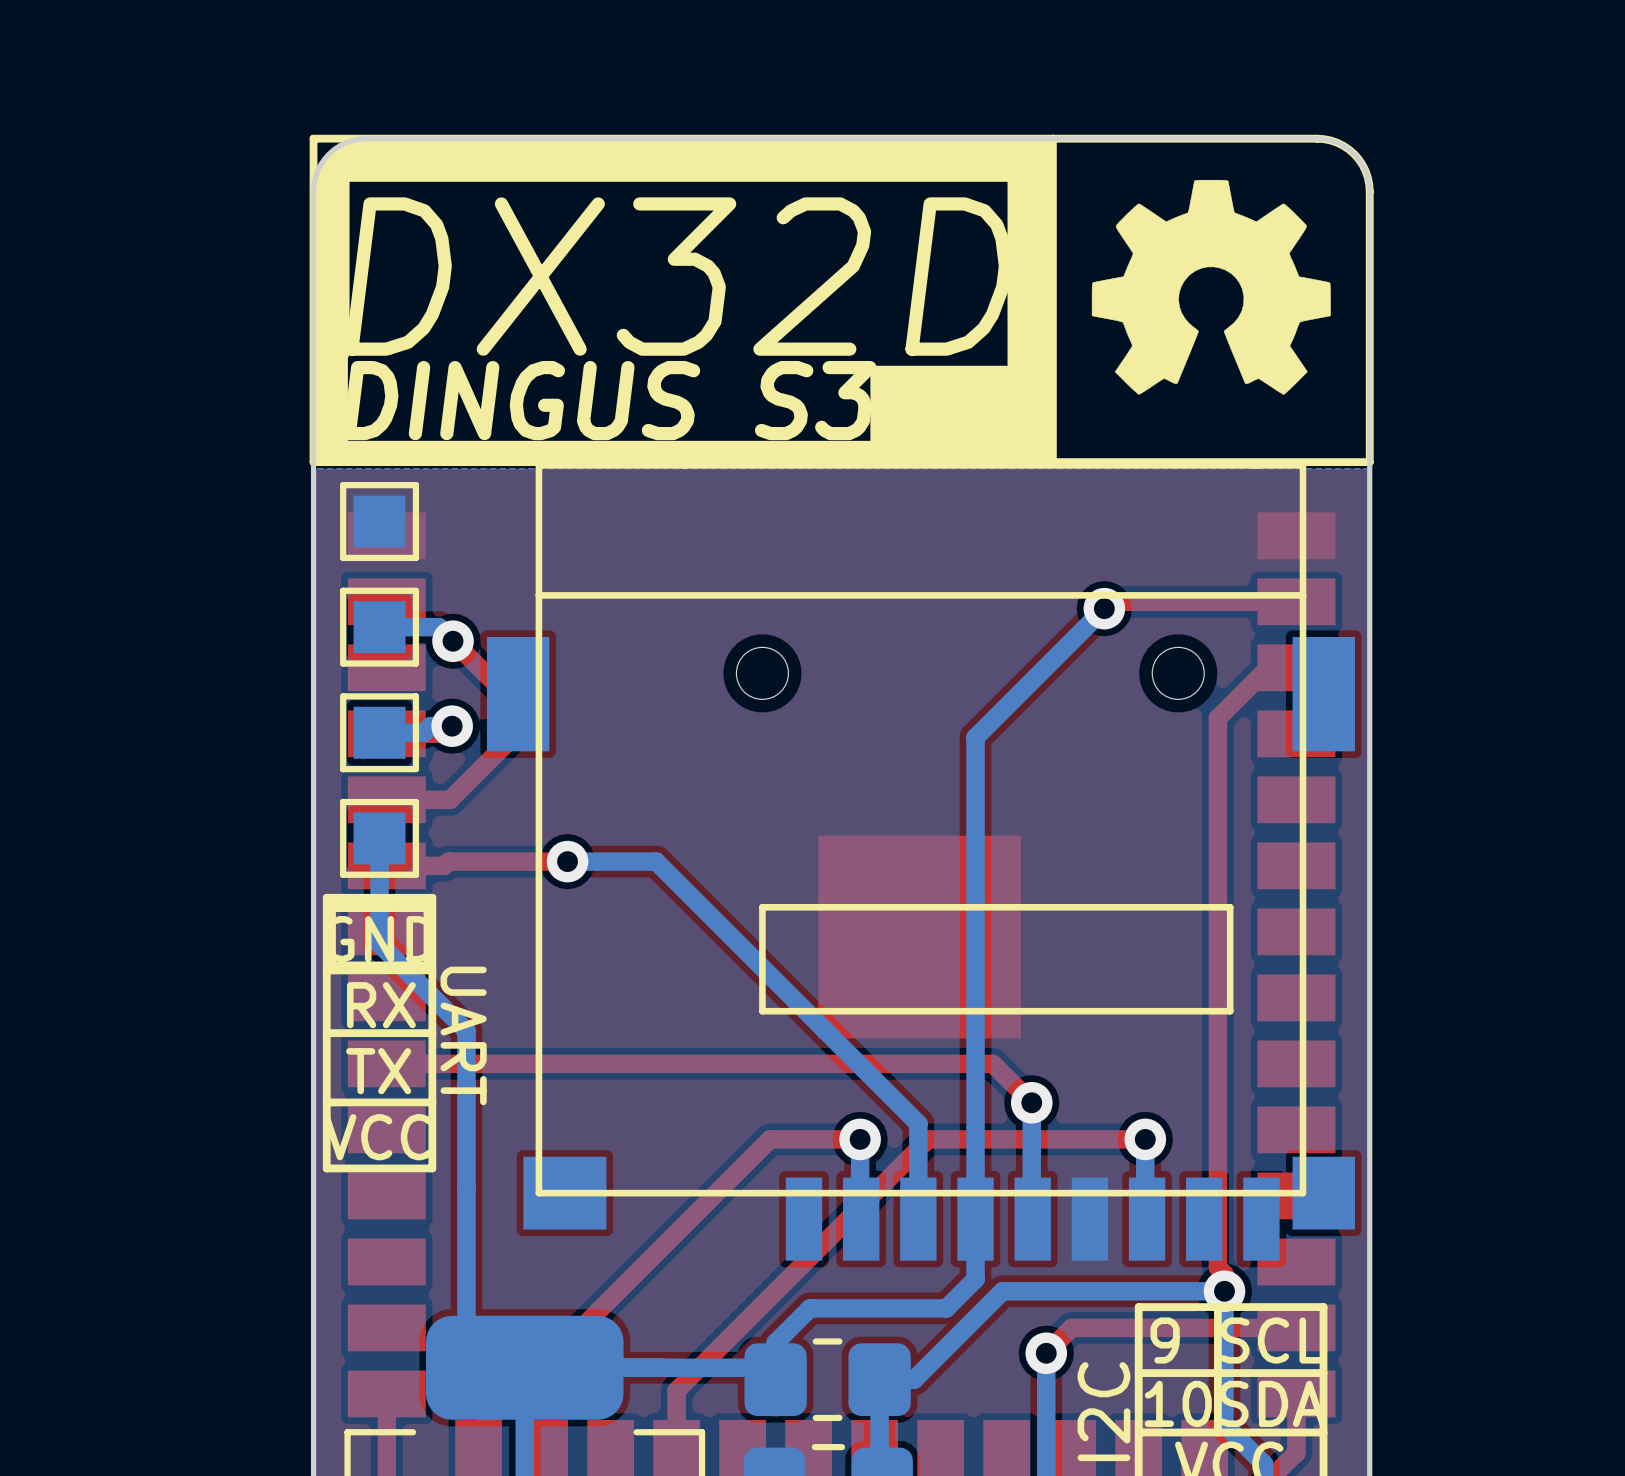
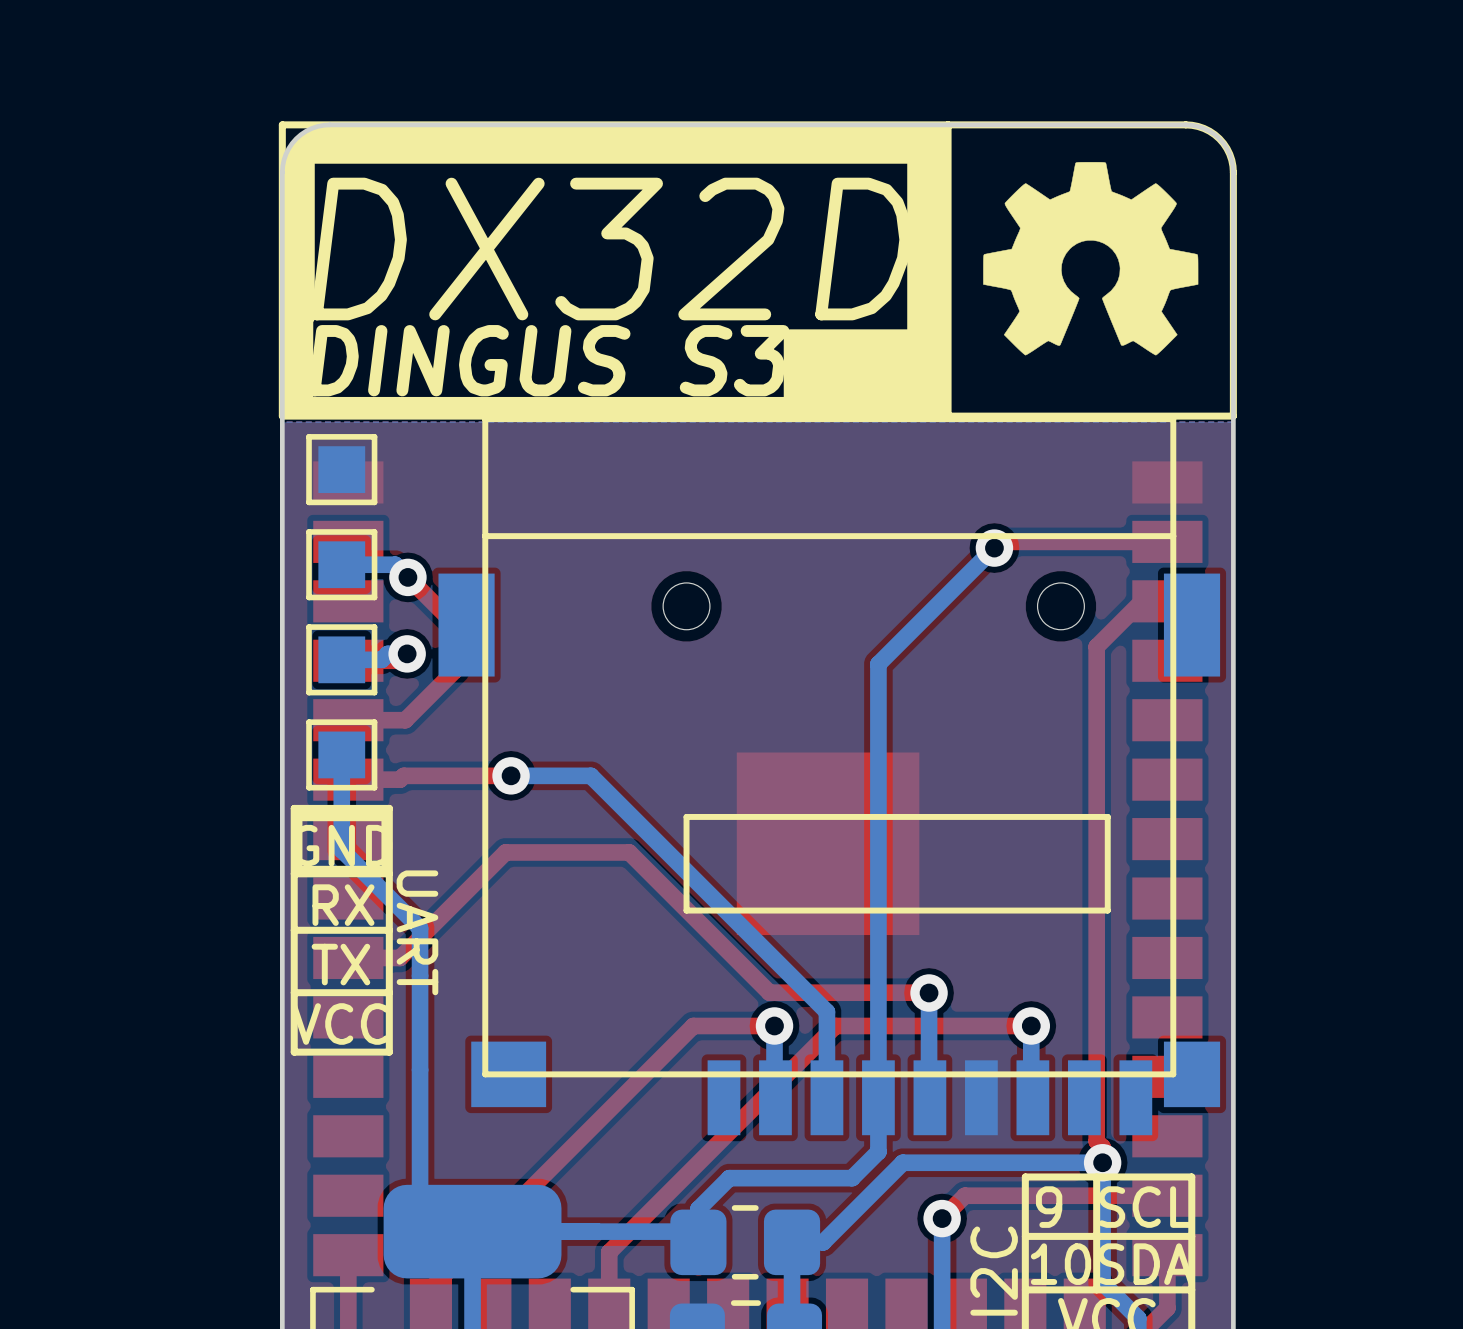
top track: (444, 1063) (992, 1063) (1031, 1102) -> (400, 957) (505, 852) (629, 852) (769, 992) (928, 992)

